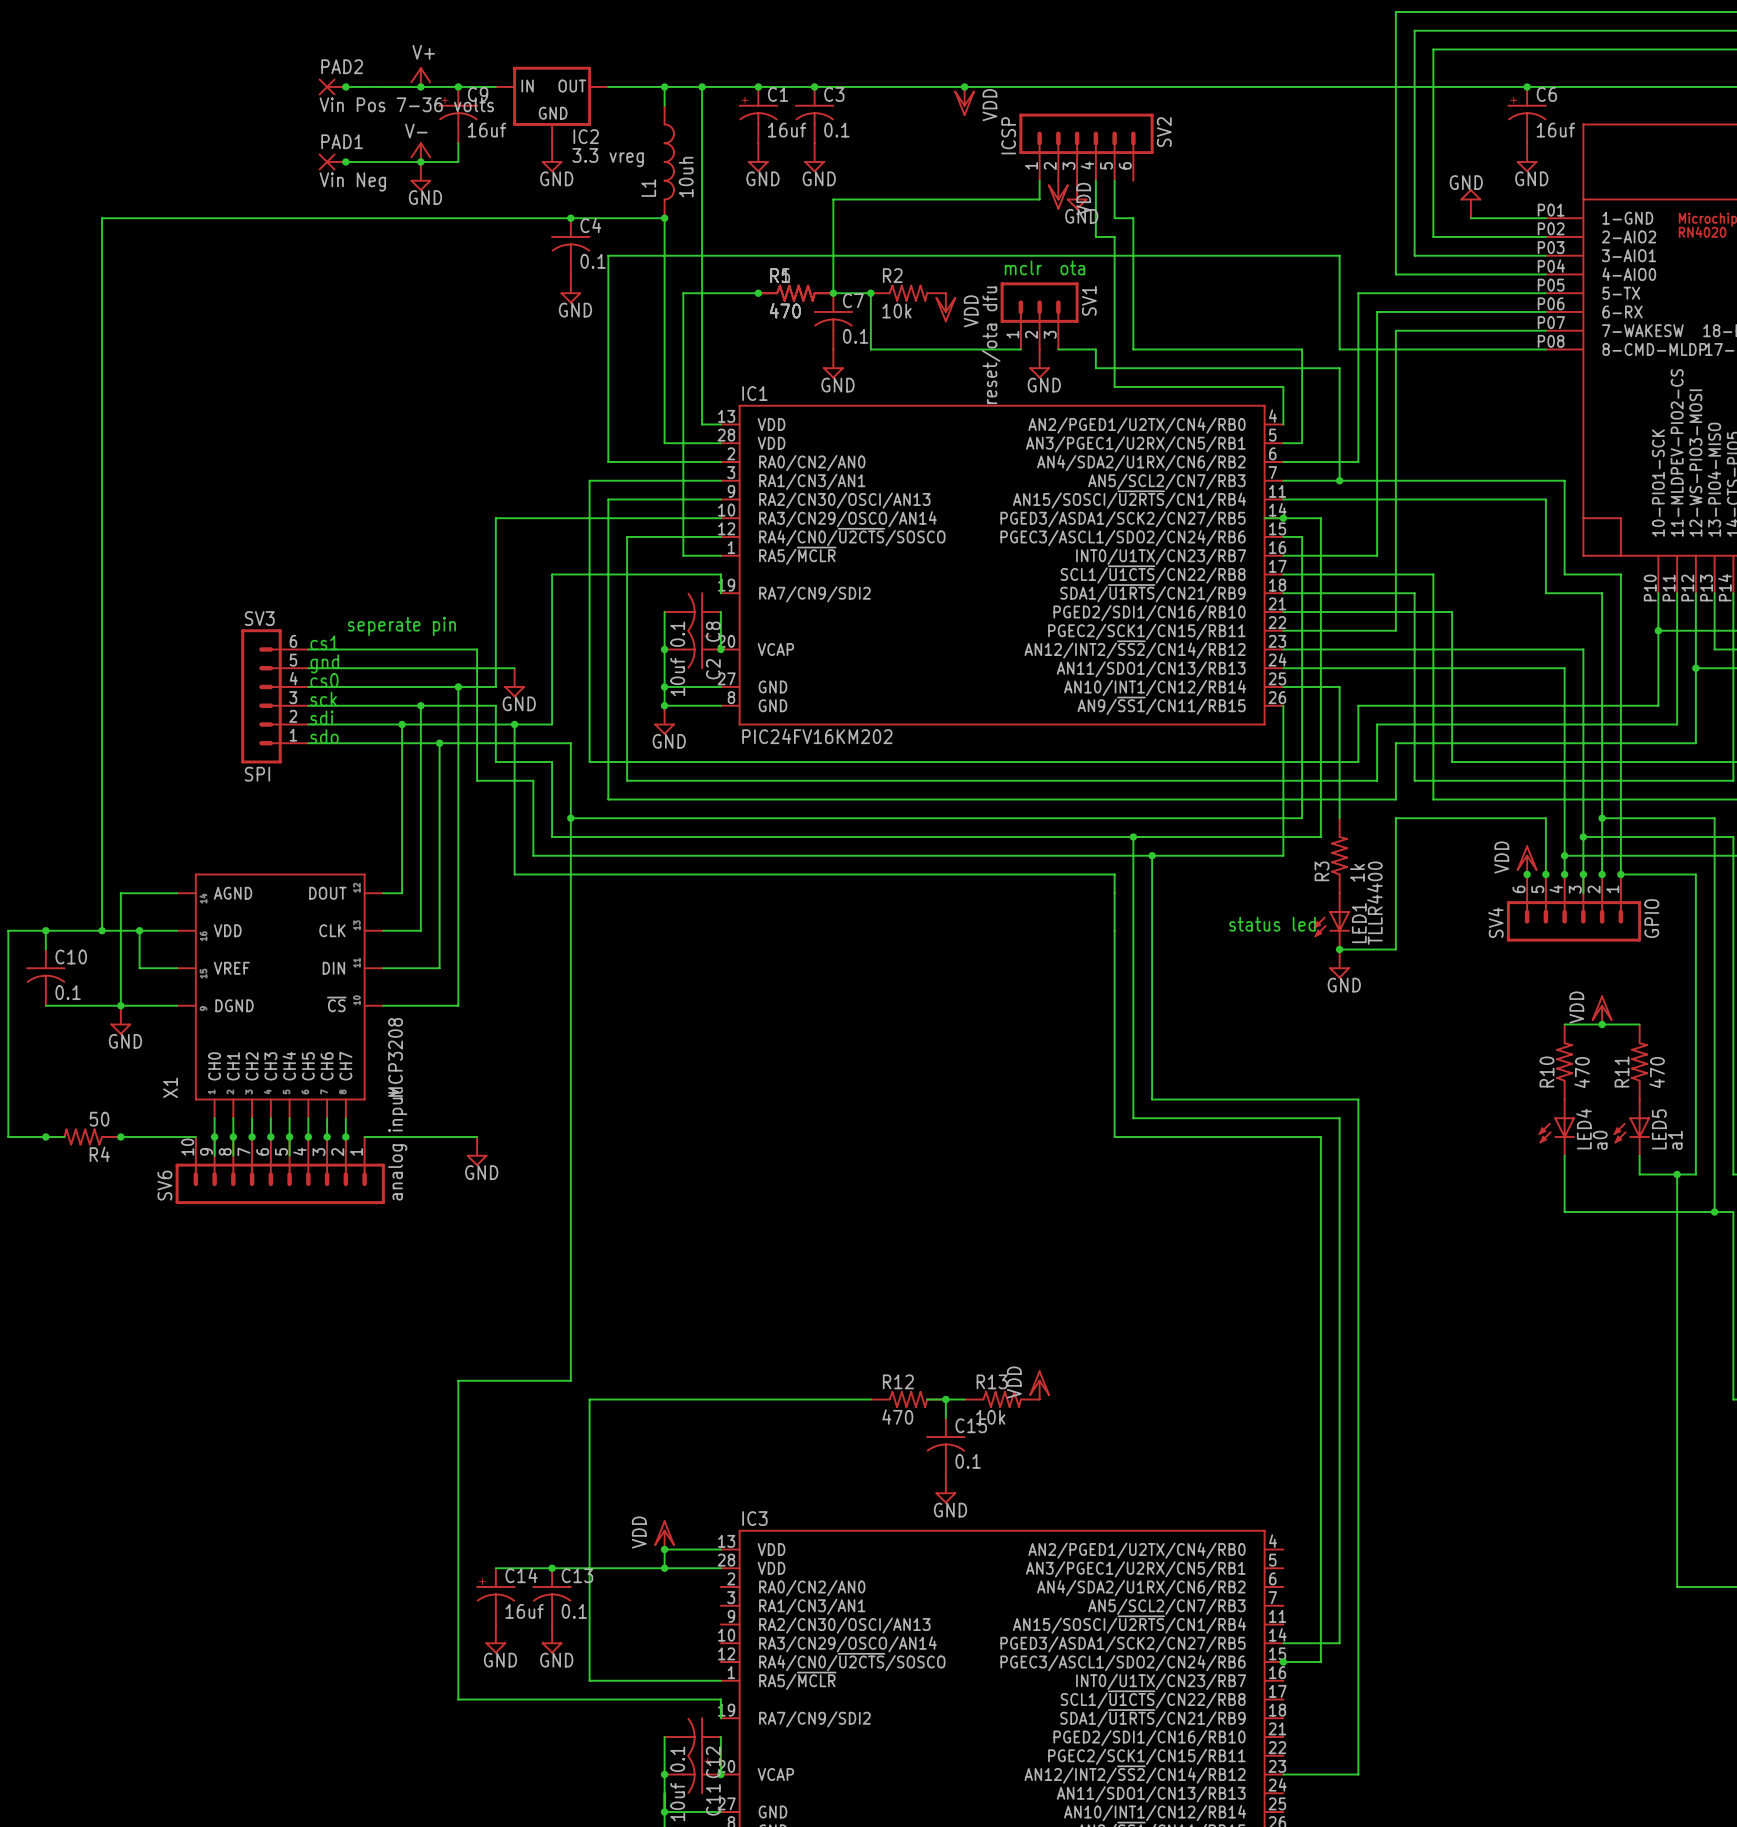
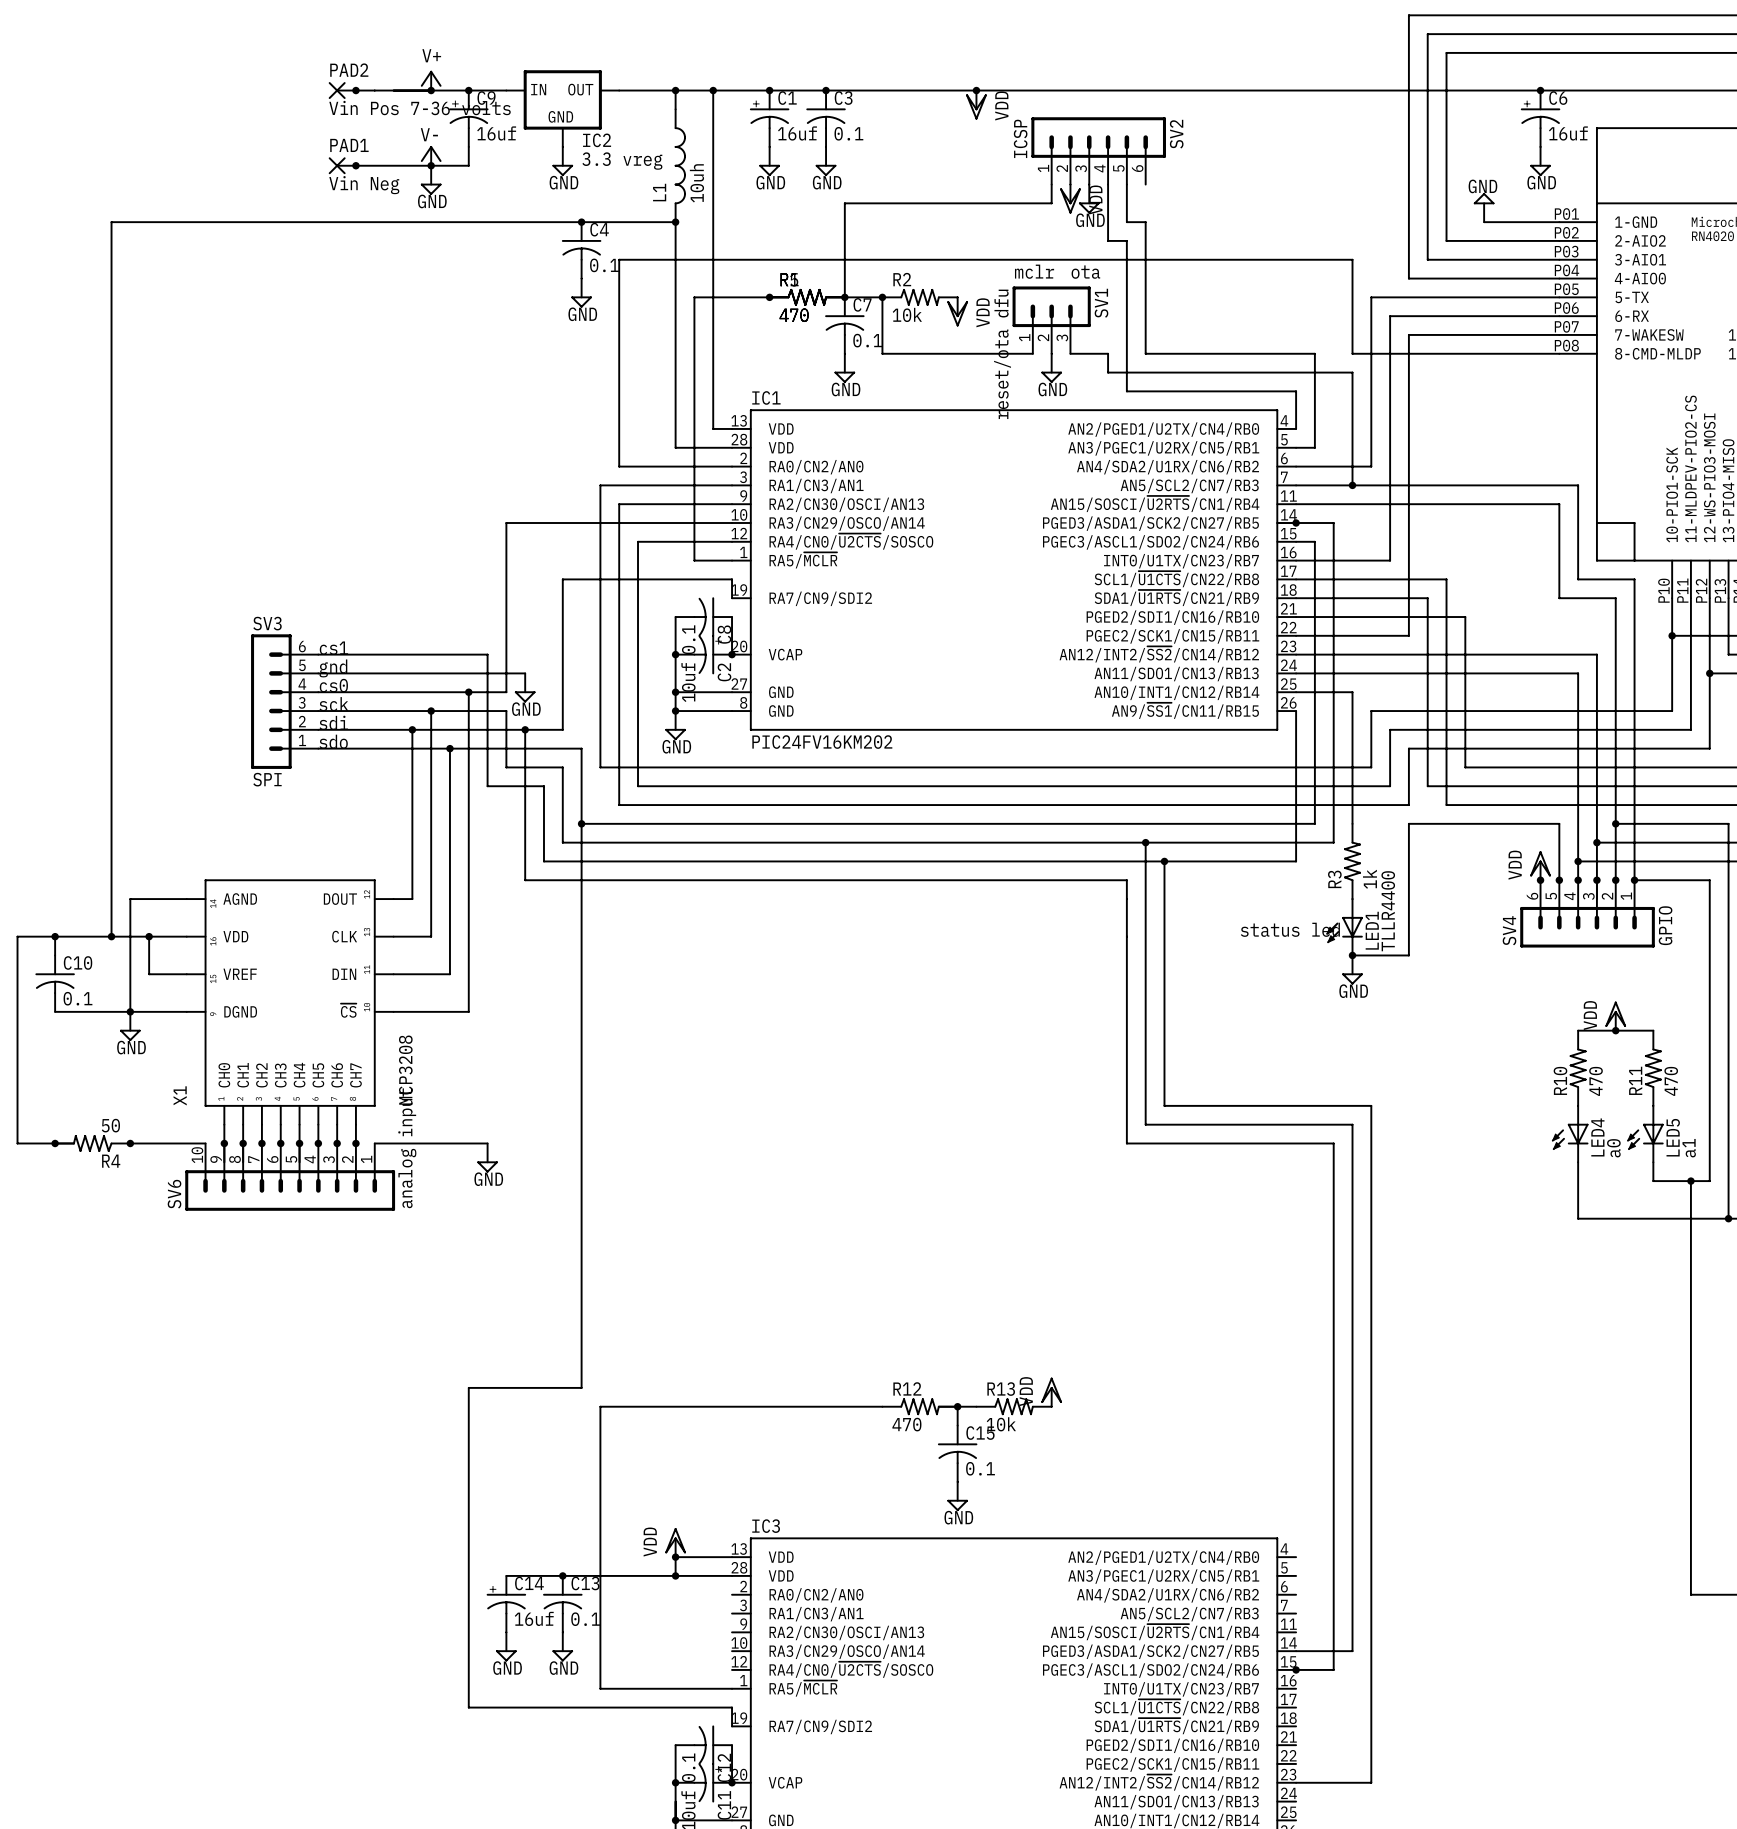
text: seperate pin (401, 626) -> none

